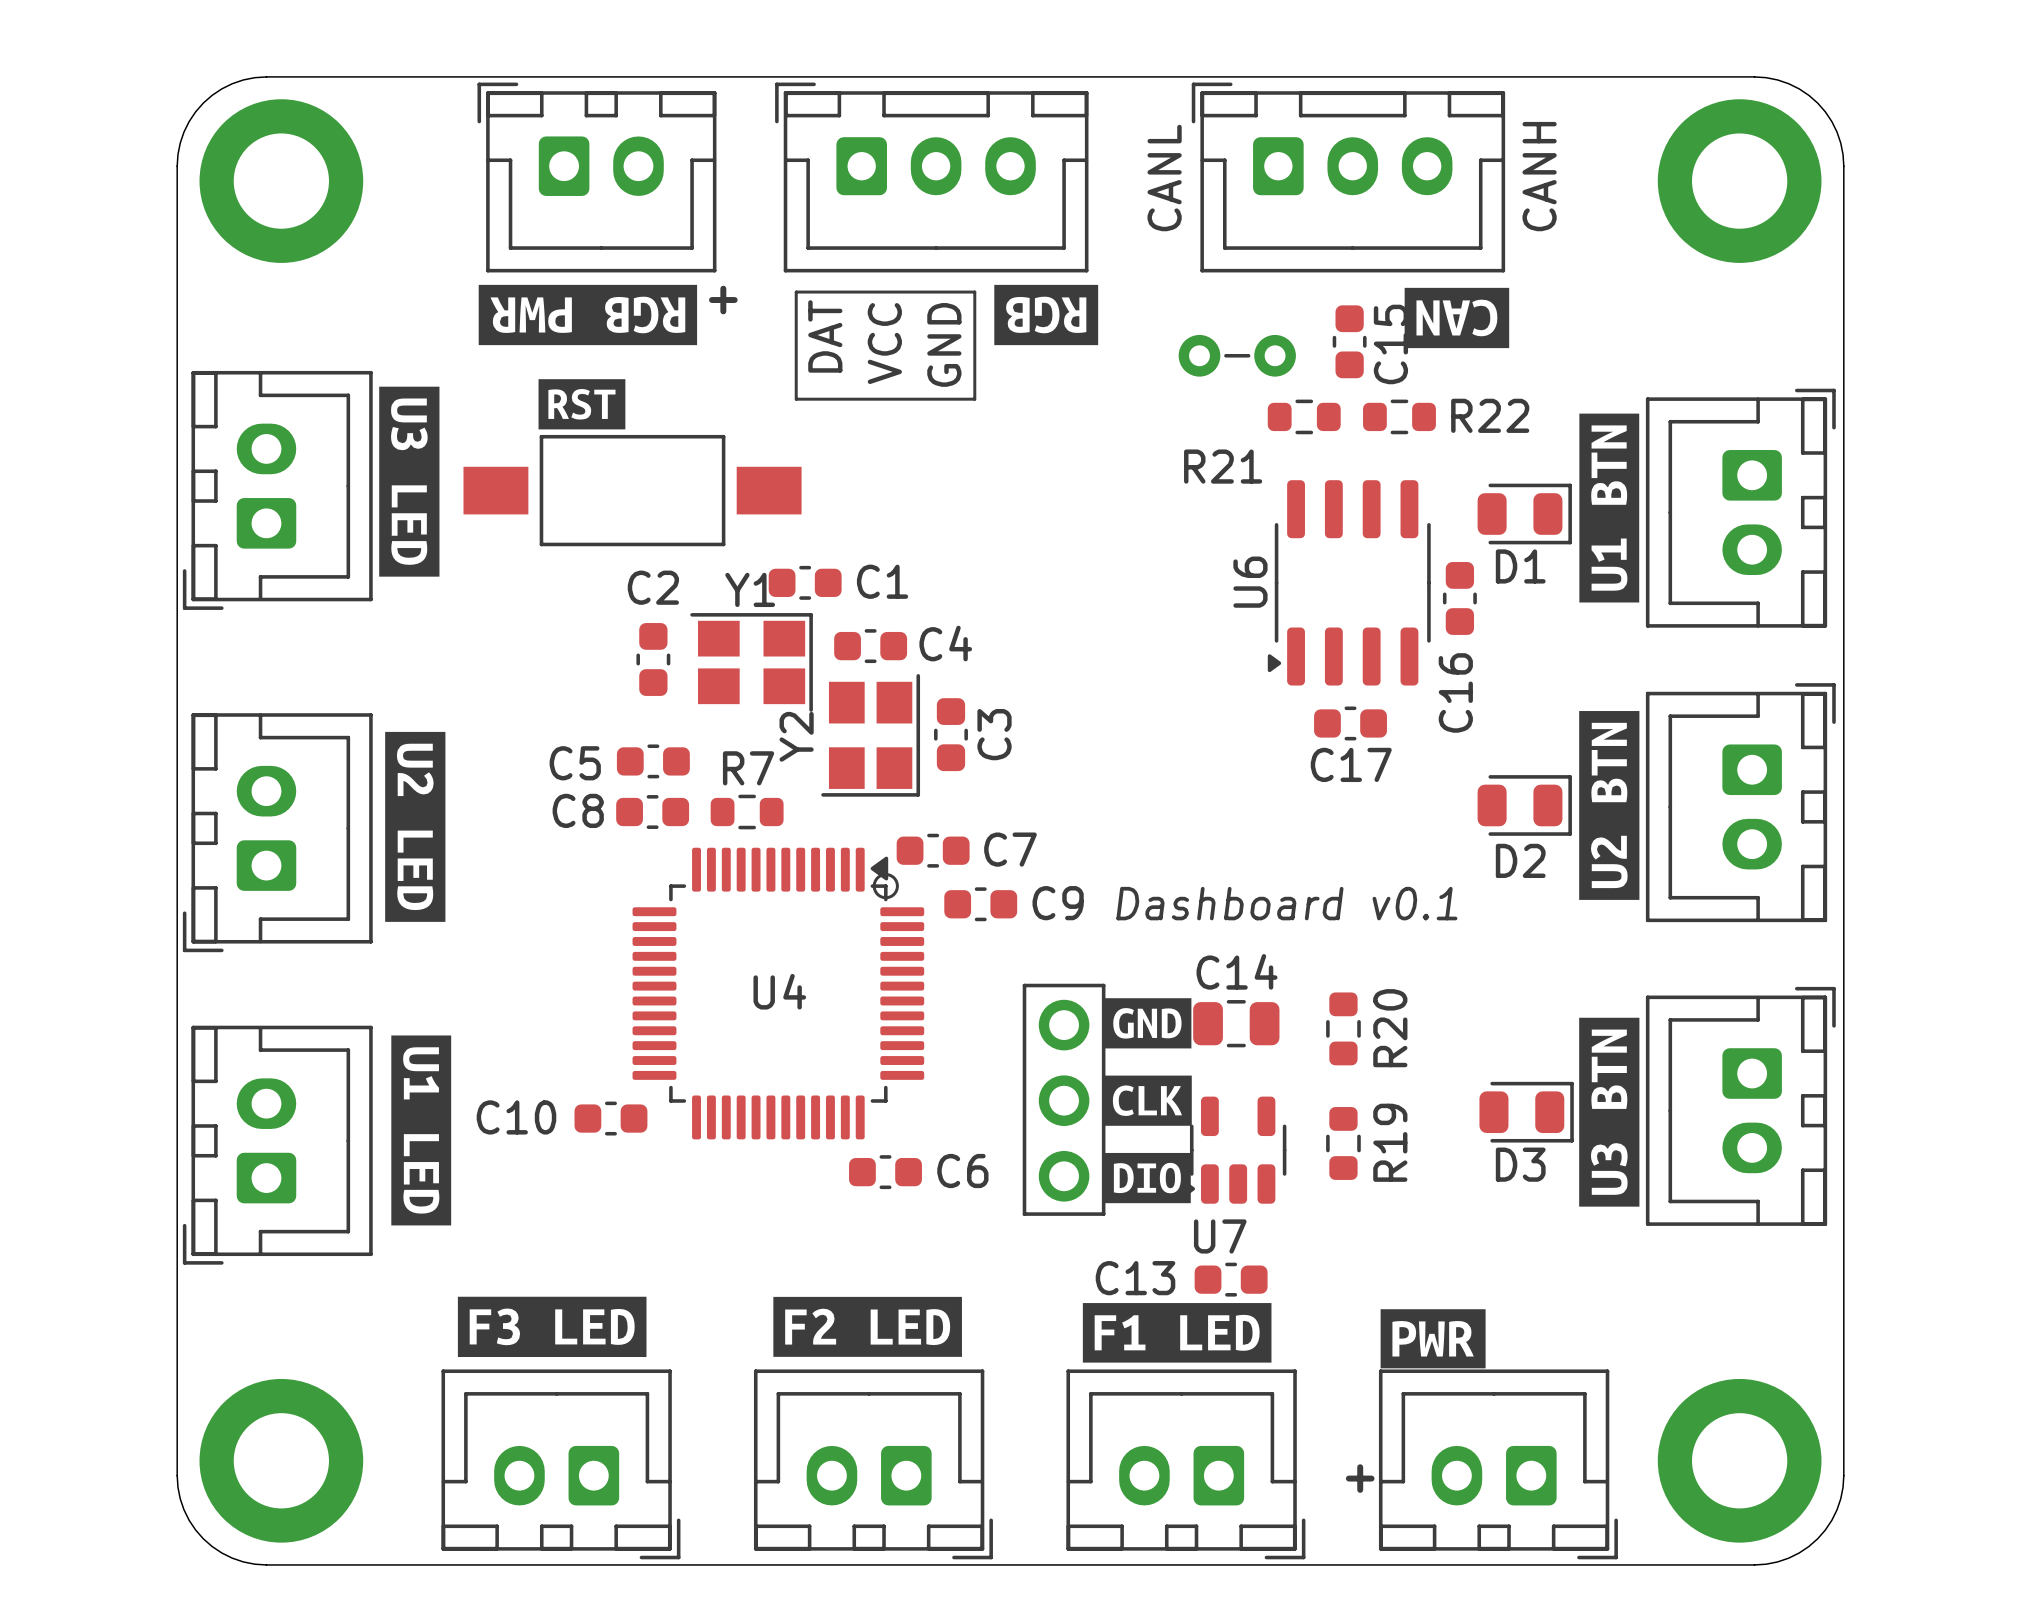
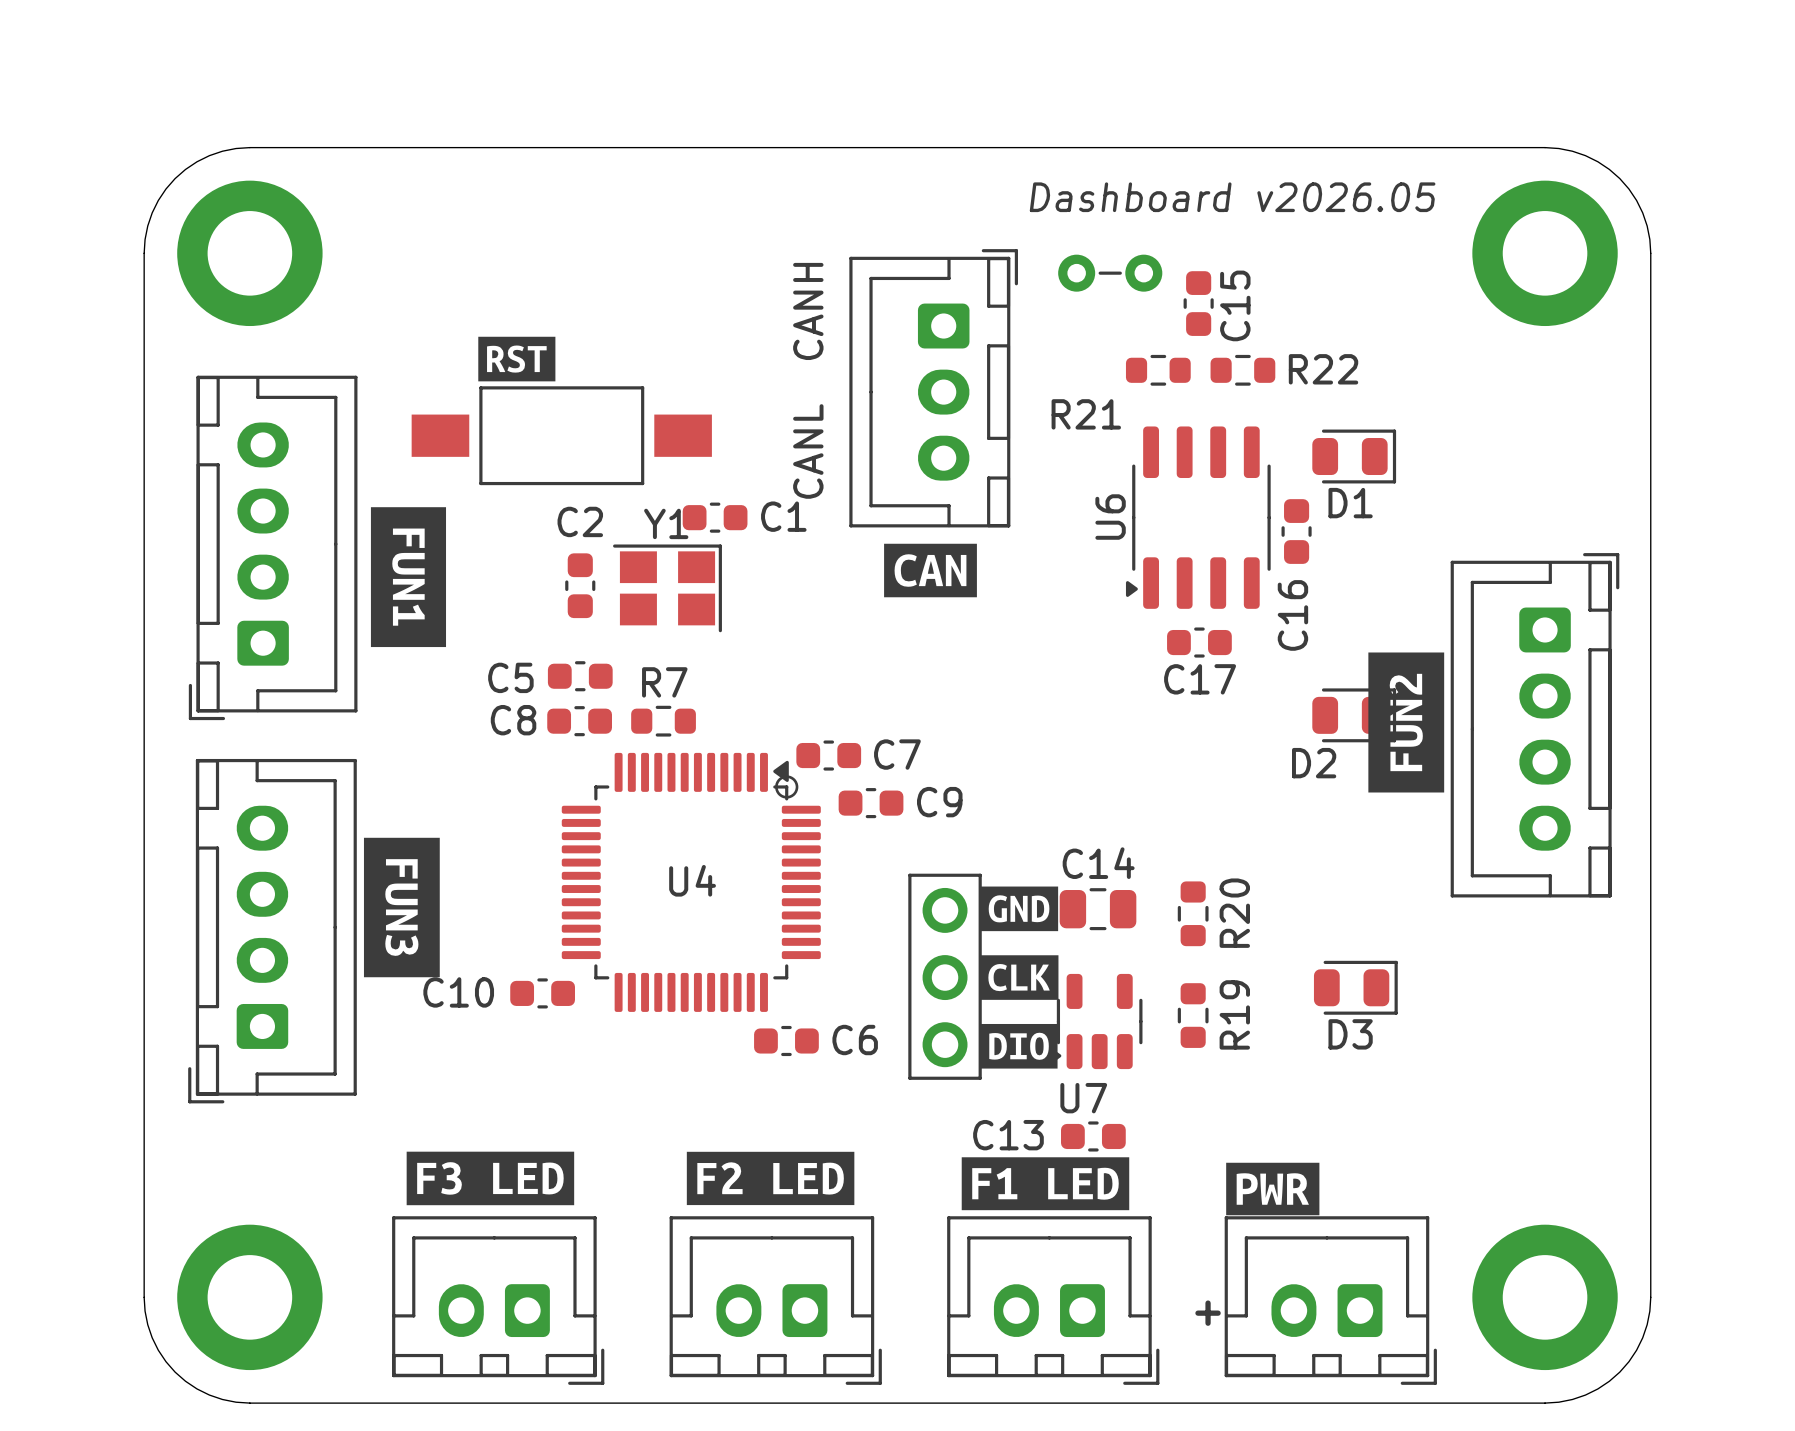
board edge: (266, 76) (1754, 76) (1766, 77) (1788, 83) (1808, 95) (1817, 103) (1831, 121) (1837, 132) (1840, 143) (1843, 166) (1843, 1475) (1843, 1487) (1837, 1509) (1825, 1530) (1817, 1538) (1808, 1546) (1788, 1558) (1766, 1564) (1754, 1564) (266, 1564) (243, 1561) (232, 1558) (212, 1546) (203, 1538) (189, 1520) (183, 1509) (177, 1487) (177, 1475) (177, 166) (180, 143) (183, 132) (189, 121) (203, 103) (221, 88) (232, 83) (254, 77) (266, 76) -> (249, 147) (236, 148) (209, 155) (197, 161) (175, 178) (158, 200) (152, 212) (145, 239) (144, 253) (144, 1297) (145, 1311) (152, 1337) (158, 1350) (175, 1372) (197, 1388) (209, 1395) (236, 1402) (249, 1403) (1545, 1403) (1558, 1402) (1585, 1395) (1597, 1388) (1619, 1372) (1636, 1350) (1642, 1337) (1649, 1311) (1650, 1297) (1650, 253) (1649, 239) (1642, 212) (1636, 200) (1619, 178) (1597, 161) (1585, 155) (1558, 148) (1545, 147) (249, 147)
text position: CANH (1539, 176) -> CANH (808, 311)
part: (596, 177) -> none
part: (931, 177) -> none
part: (1348, 177) -> none
text position: CANL (1164, 178) -> CANL (808, 451)
part position: (281, 181) -> (249, 253)
part position: (1739, 181) -> (1545, 253)
text: none -> Dashboard v2026.05 (1232, 197)
drawing: [478, 284, 698, 346] -> none
drawing: [994, 284, 1099, 346] -> none
drawing: [1404, 287, 1510, 349] -> none
line: (796, 292) (974, 292) (974, 399) (796, 399) (796, 292) -> none
text: + (723, 300) -> none
text: DAT (825, 336) -> none
text: VCC (884, 343) -> none
text: GND (944, 344) -> none
part position: (1237, 355) -> (1110, 273)
drawing: [379, 386, 440, 577] -> none
drawing: [1579, 413, 1640, 603] -> none
part: none -> (933, 388)
part: (277, 490) -> none
part: (1740, 508) -> none
drawing: none -> [370, 507, 447, 648]
drawing: none -> [884, 543, 977, 598]
part: none -> (273, 547)
C4: (870, 646) -> none
part footprint: [1645, 683, 1836, 923] -> [1450, 553, 1620, 898]
drawing shape: [1579, 711, 1640, 900] -> [1368, 652, 1445, 793]
drawing: [385, 731, 446, 922] -> none
C3: (950, 734) -> none
Y2: (870, 735) -> none
part: (277, 832) -> none
D2 name position: D2 (1520, 860) -> D2 (1314, 763)
text: Dashboard v0.1 (1286, 903) -> none
drawing: none -> [363, 837, 440, 978]
drawing: [1579, 1017, 1640, 1207] -> none
drawing: [391, 1035, 452, 1226] -> none
part: none -> (272, 931)
part: (1740, 1106) -> none
part: (277, 1145) -> none

